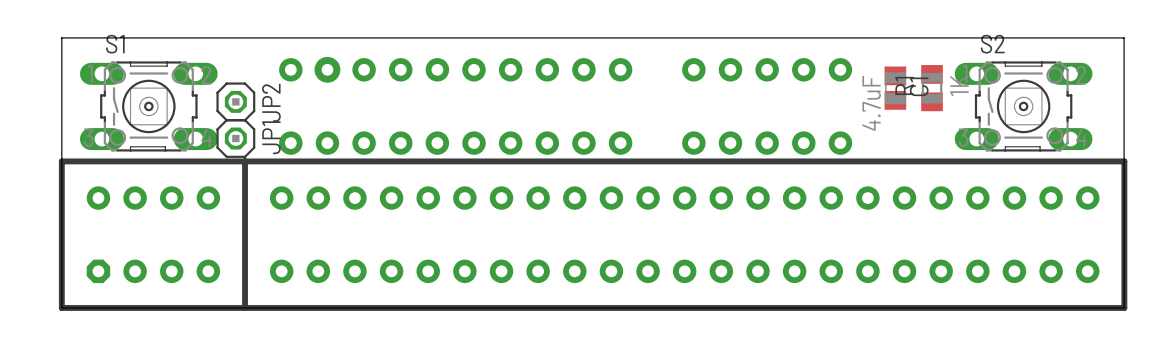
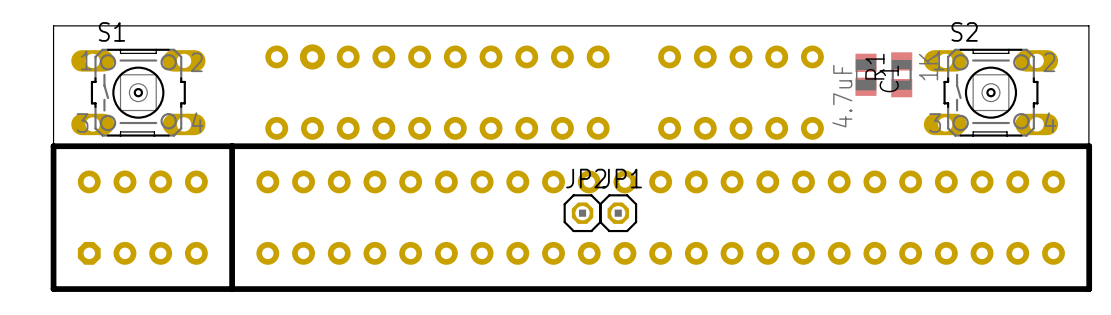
JP2 position: (235, 101) -> (582, 213)
JP2 name rotation: 0° (271, 102) -> 90° clockwise (586, 178)
JP1 name rotation: 0° (271, 137) -> 90° clockwise (621, 178)
JP1 position: (235, 138) -> (618, 213)

